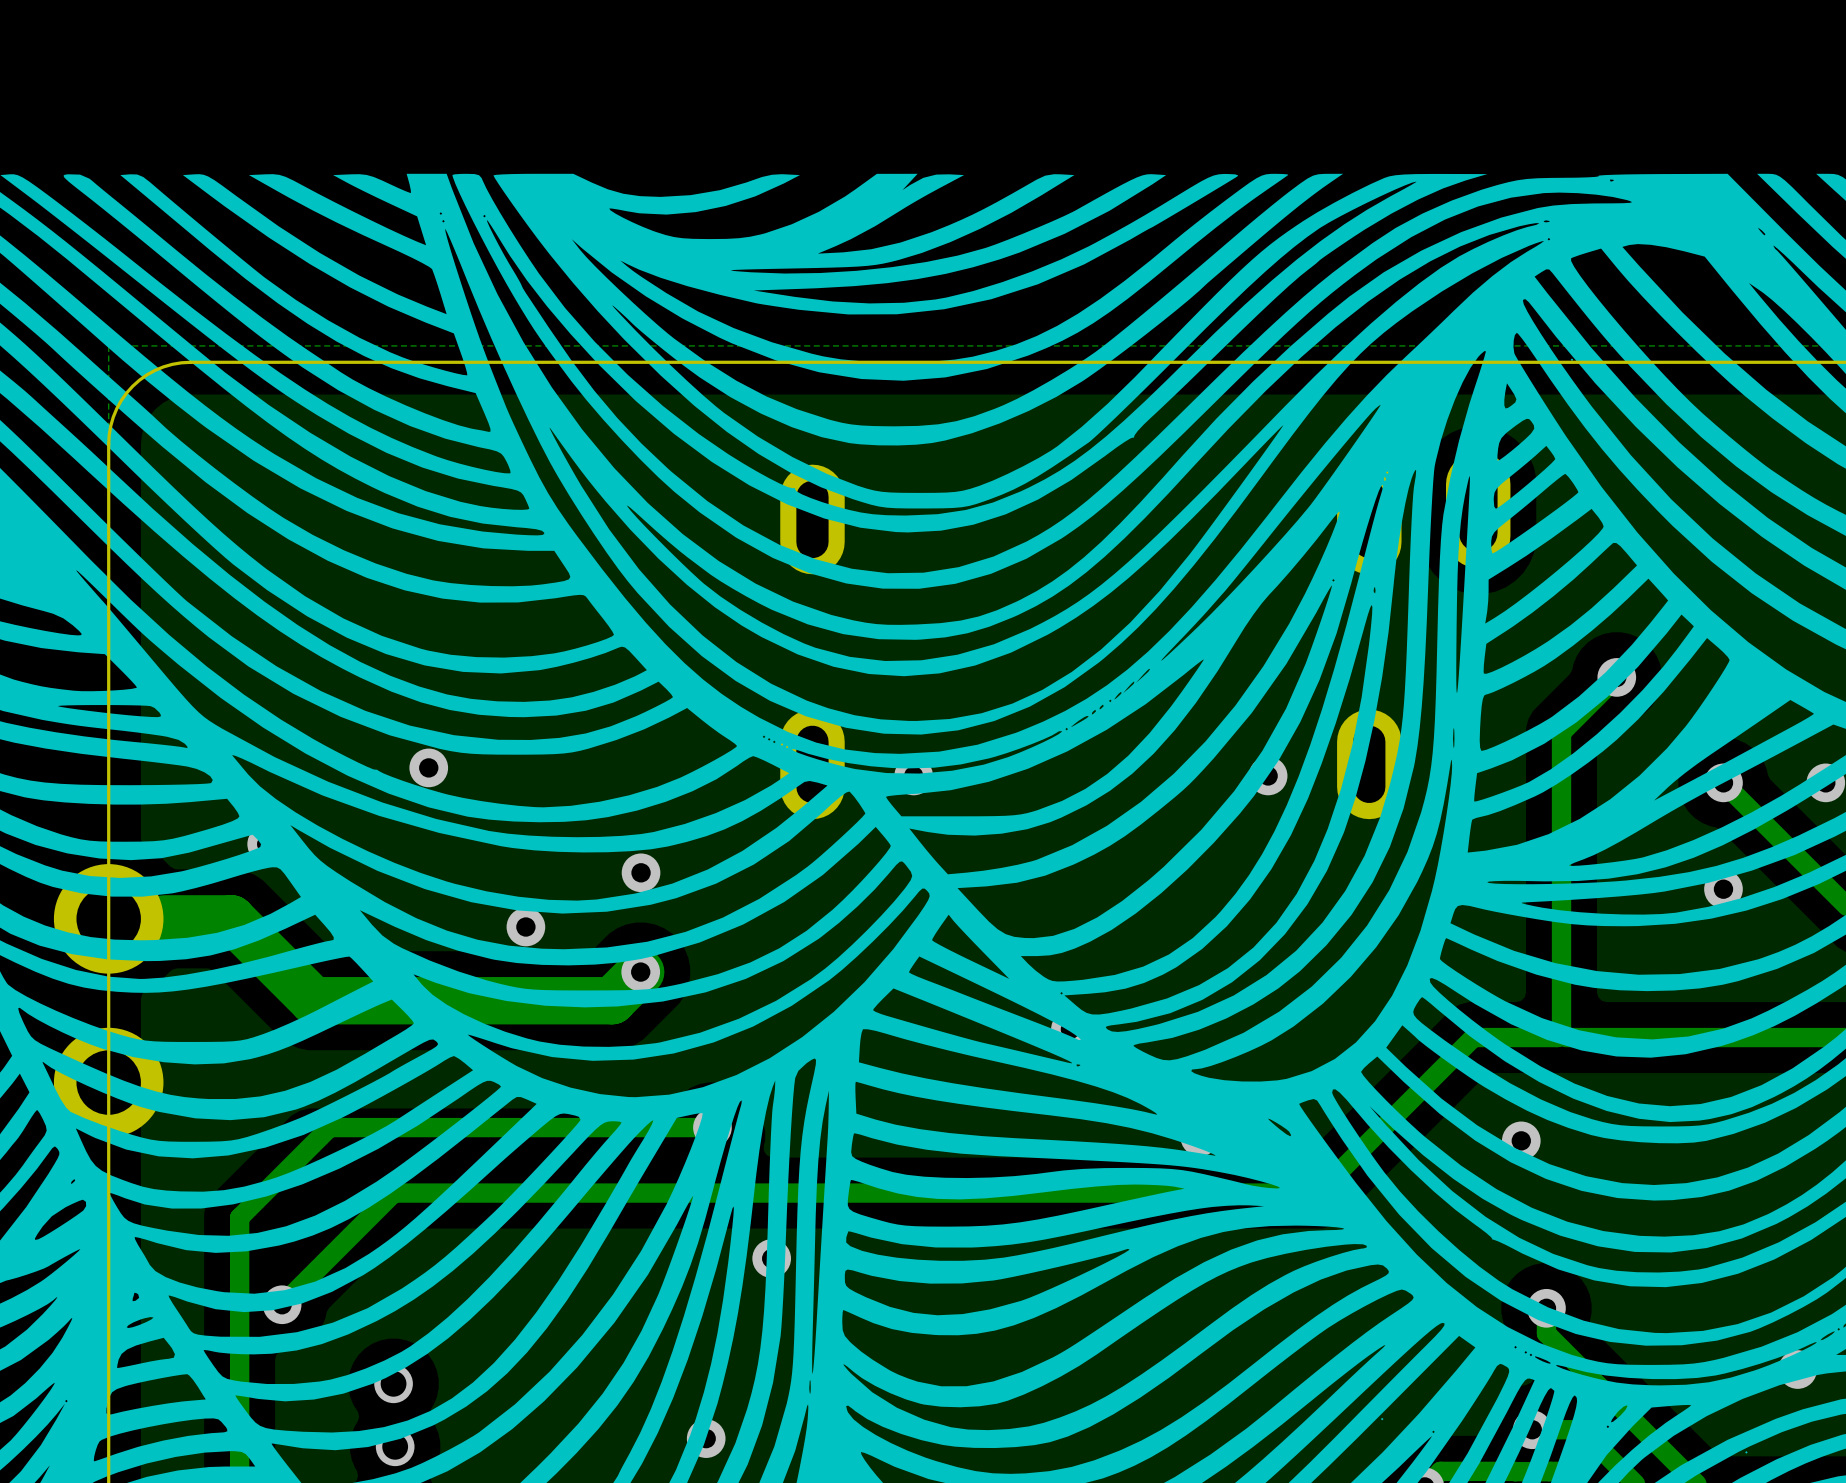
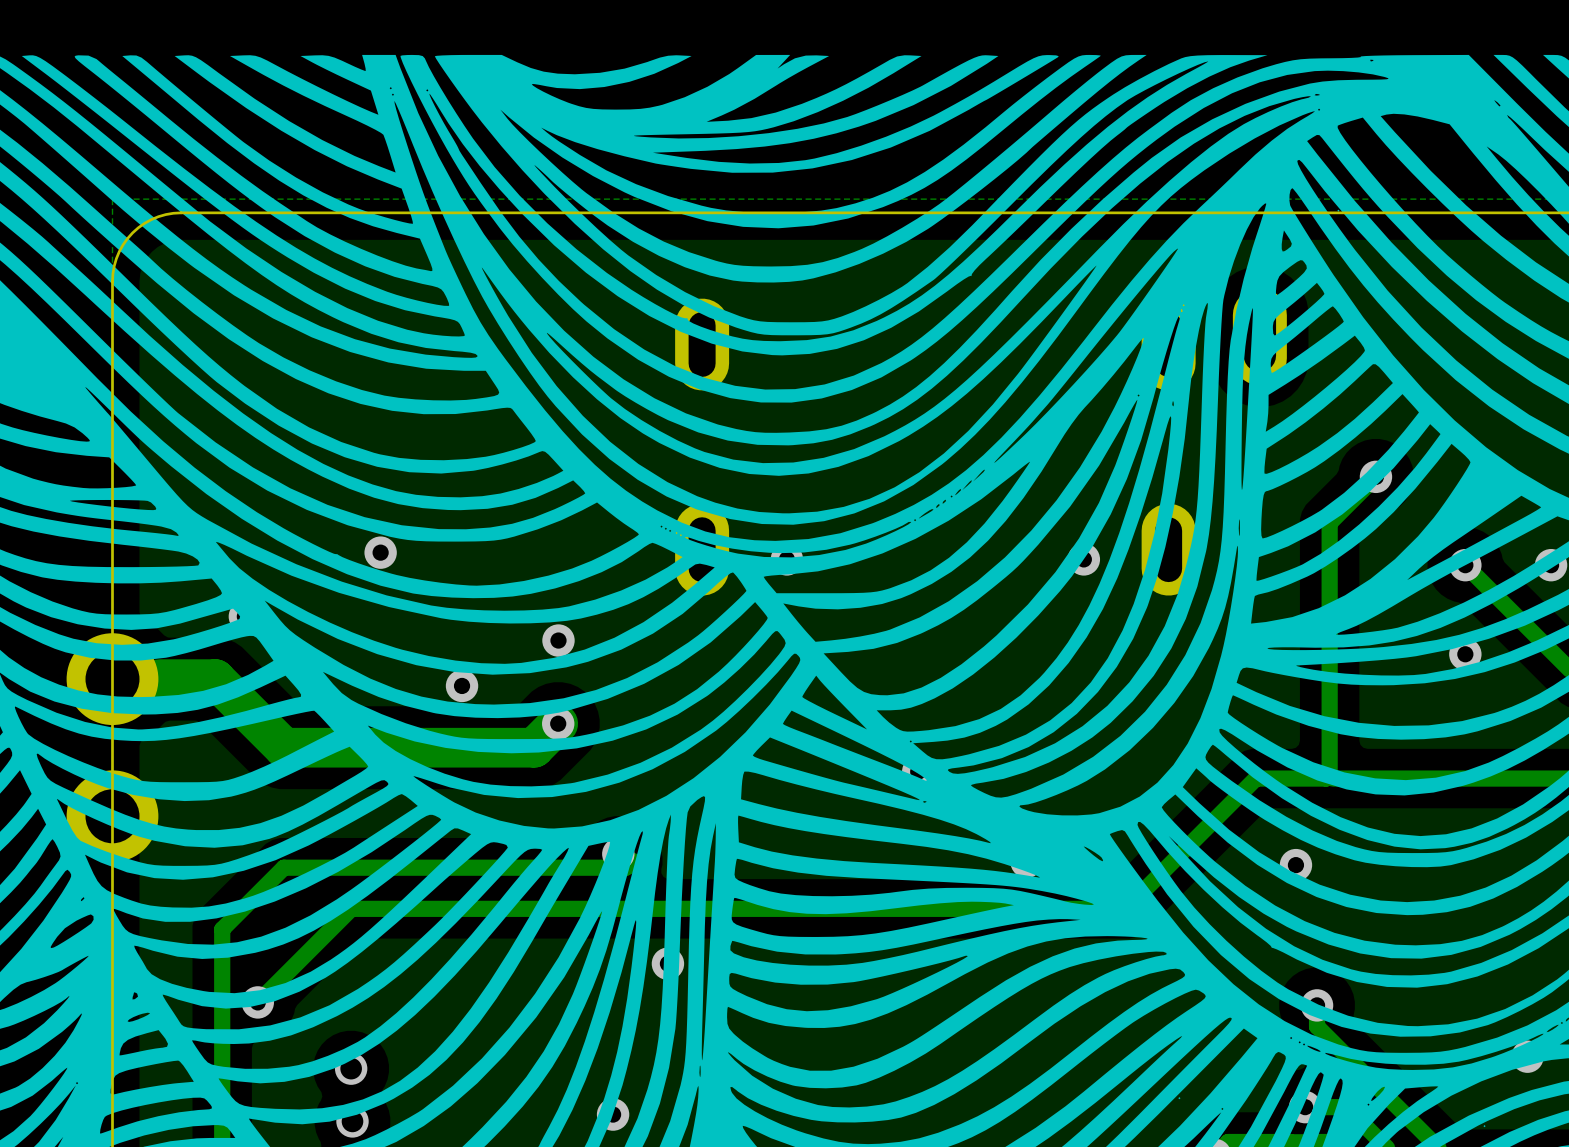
track: (712, 1127) (329, 1127) (313, 1143) -> (632, 860) (625, 867) (283, 867)

